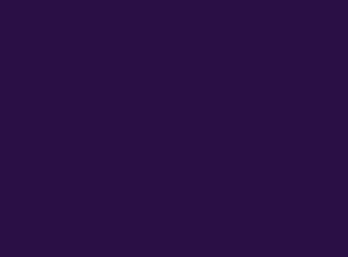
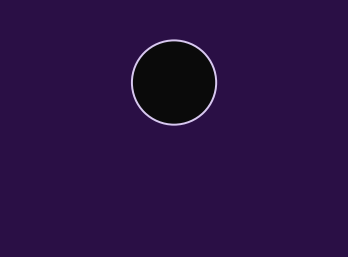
part: none -> (174, 82)

